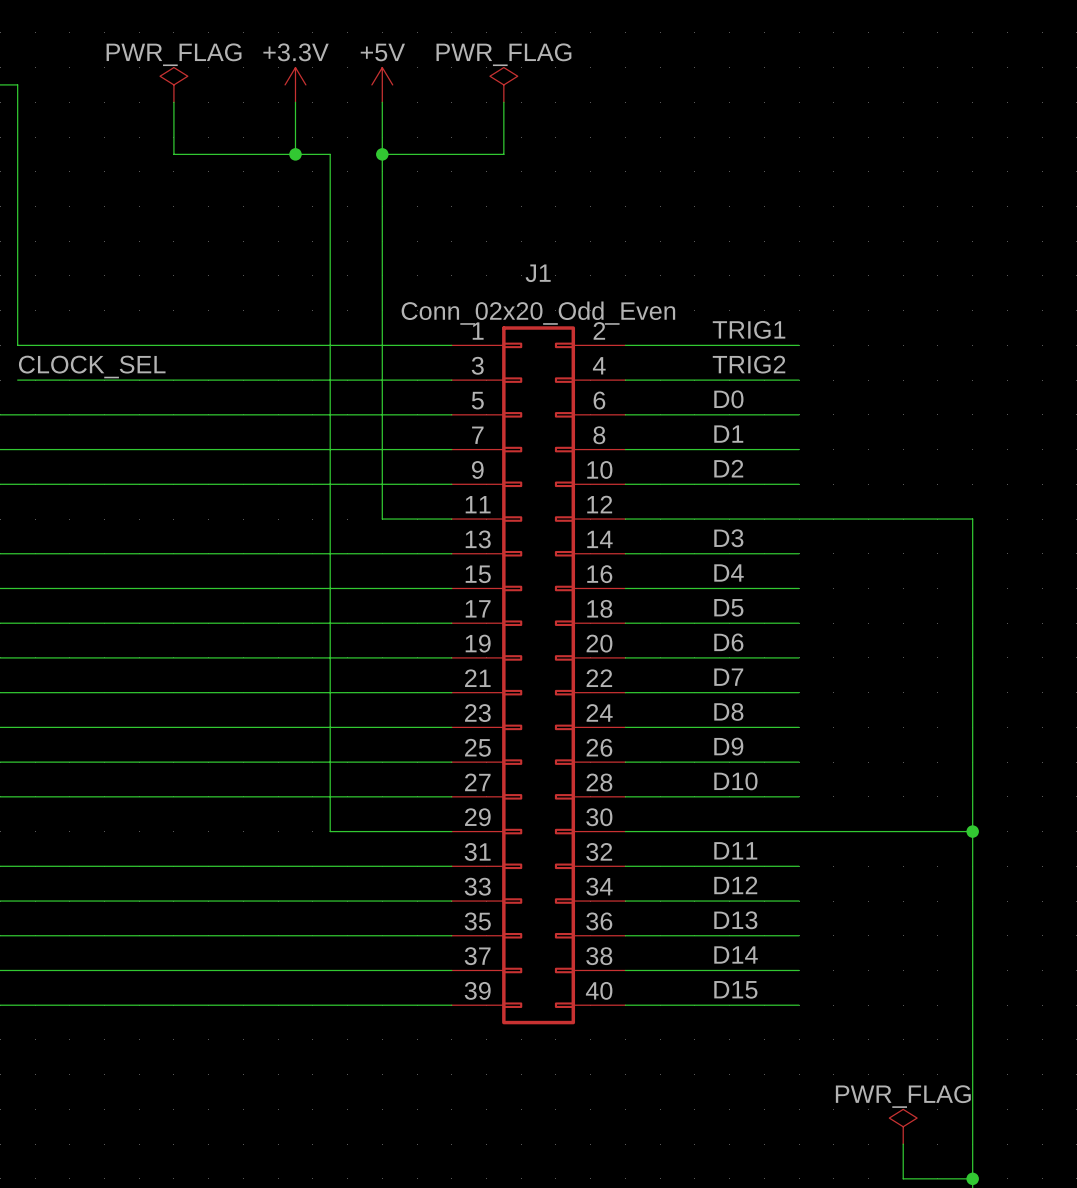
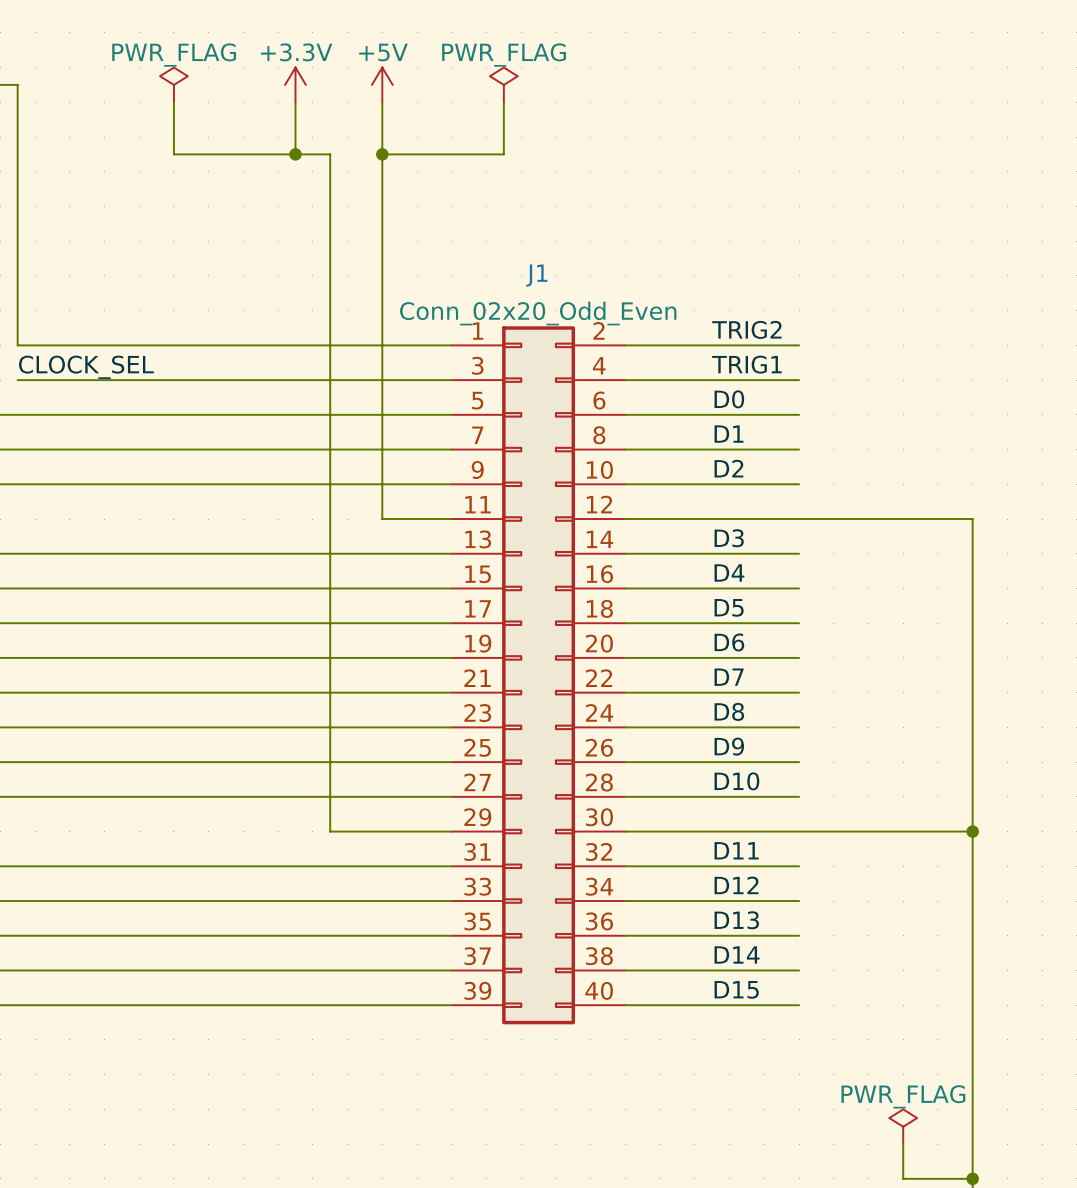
label: TRIG1 (749, 329) -> TRIG2 (746, 329)
label: TRIG2 (749, 364) -> TRIG1 (746, 364)

